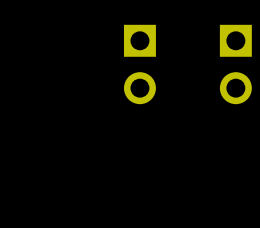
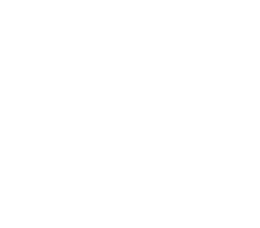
part: (139, 64) -> none
part: (235, 64) -> none

